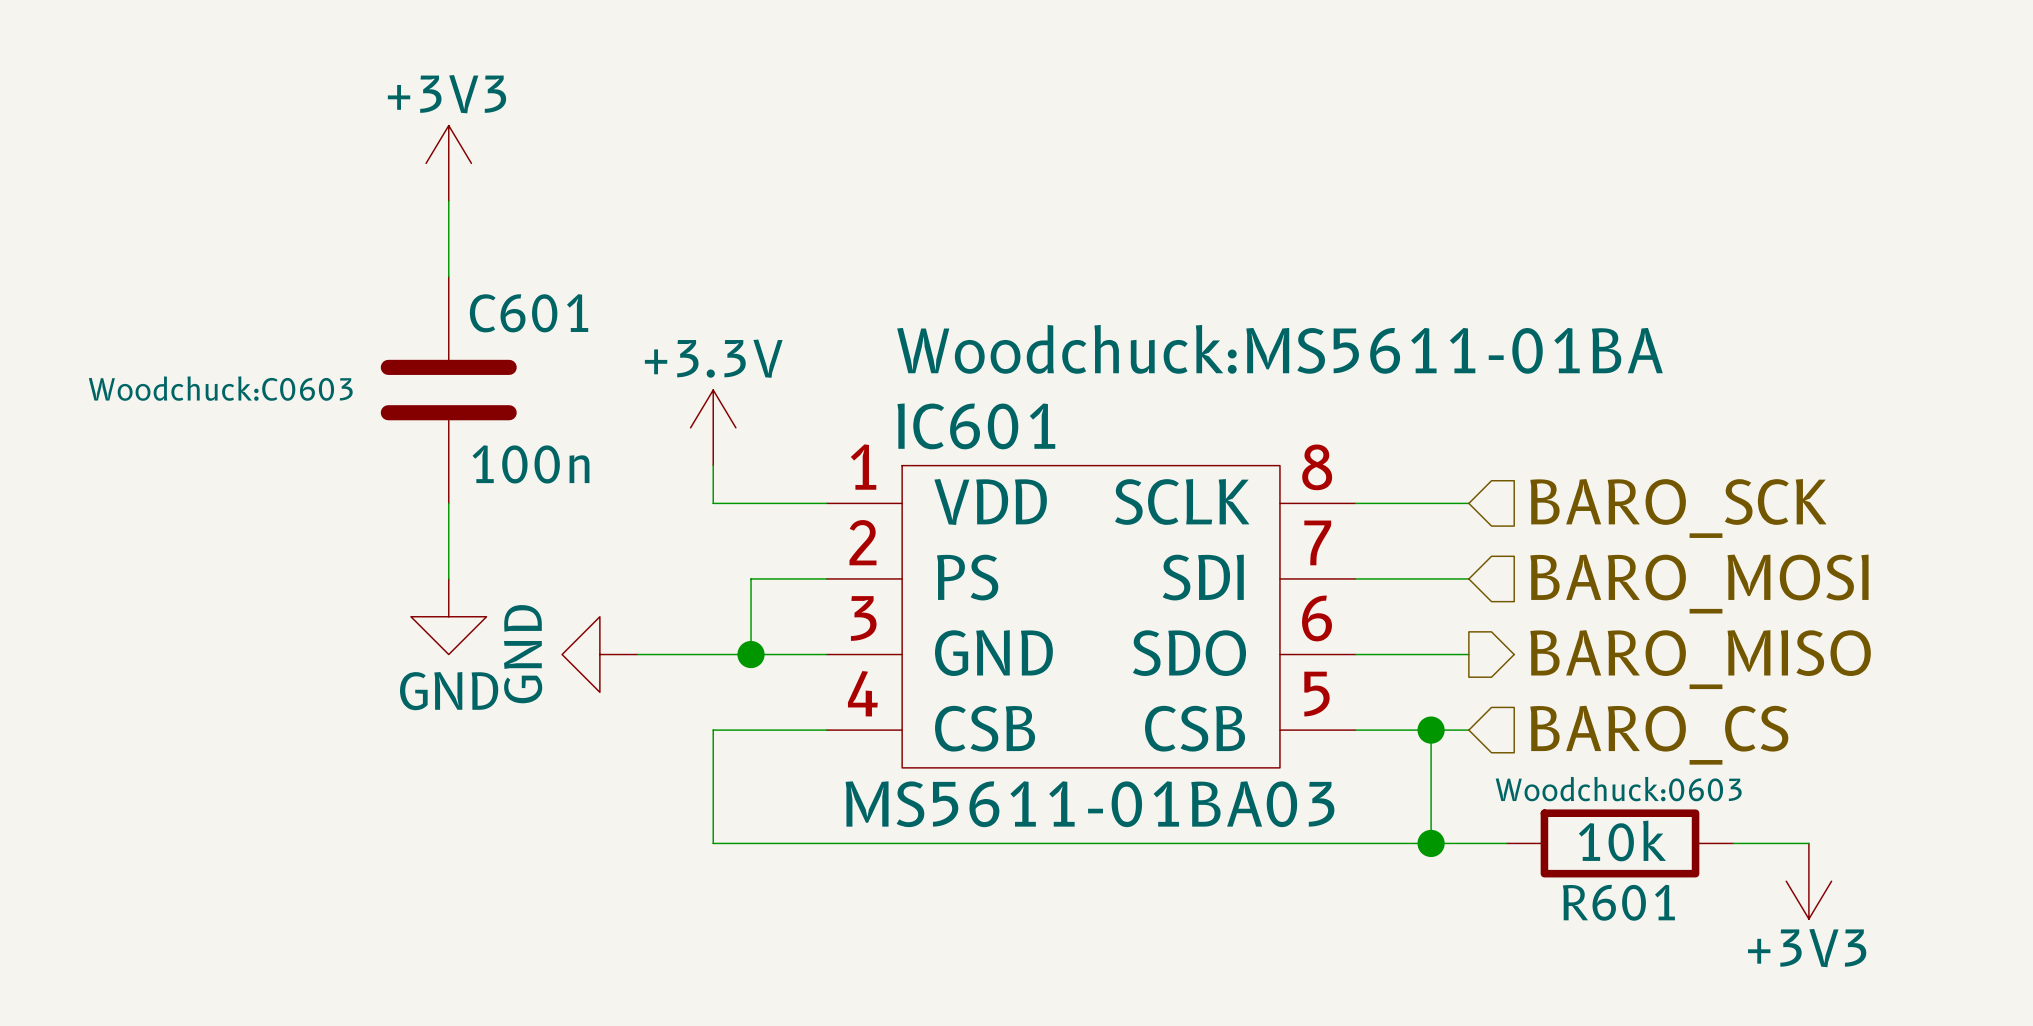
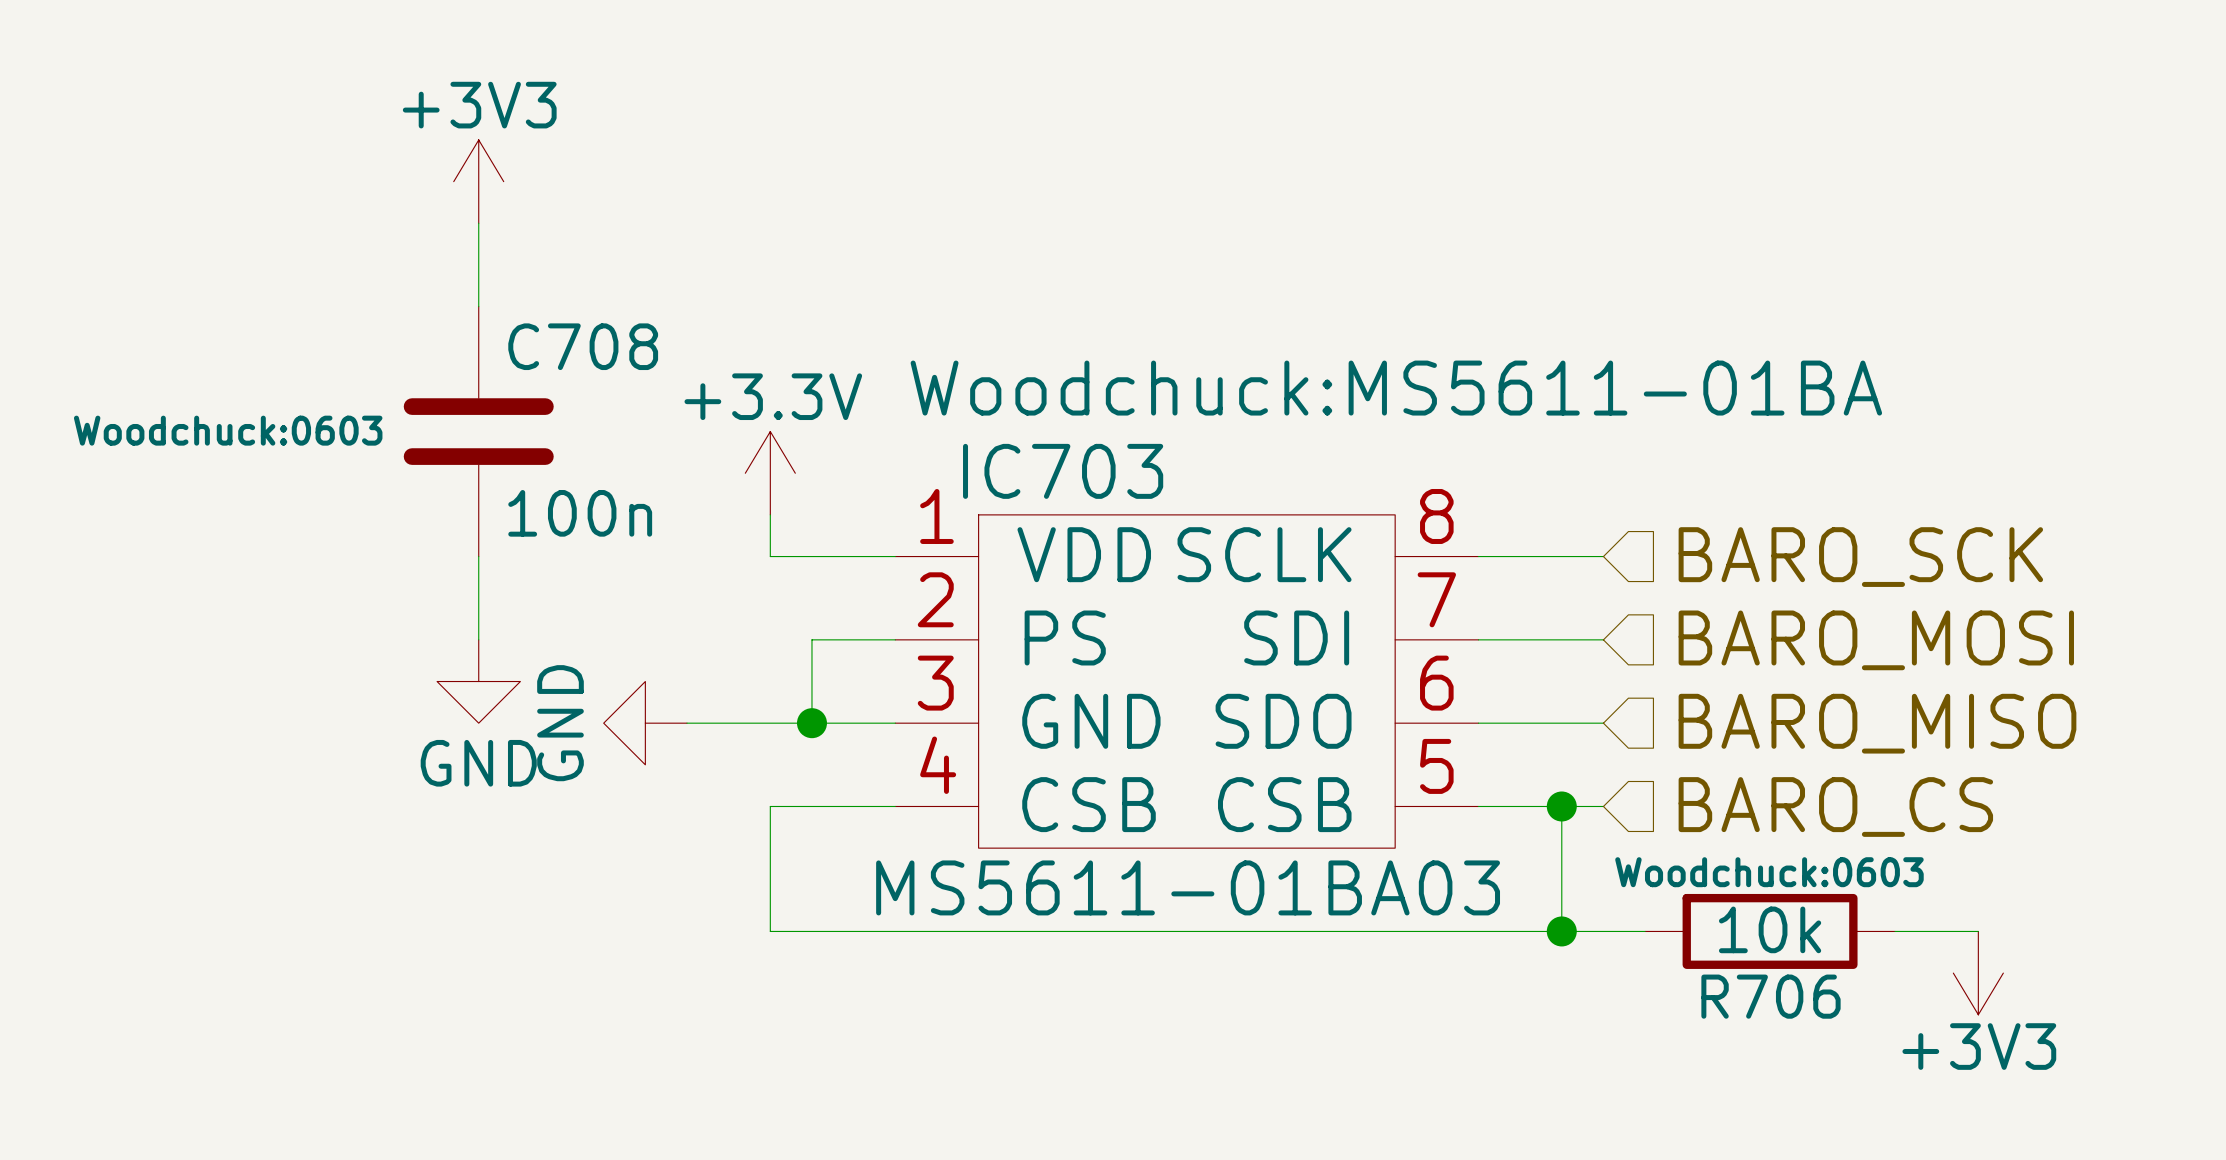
C601 name: C601 (529, 313) -> C708 (583, 346)
C601 text: Woodchuck:C0603 (220, 388) -> Woodchuck:0603 (228, 430)
IC601 name: IC601 (976, 426) -> IC703 (1063, 471)
hierarchical label shape: output (1700, 659) -> input (1877, 723)
R601 name: R601 (1618, 902) -> R706 (1770, 996)

